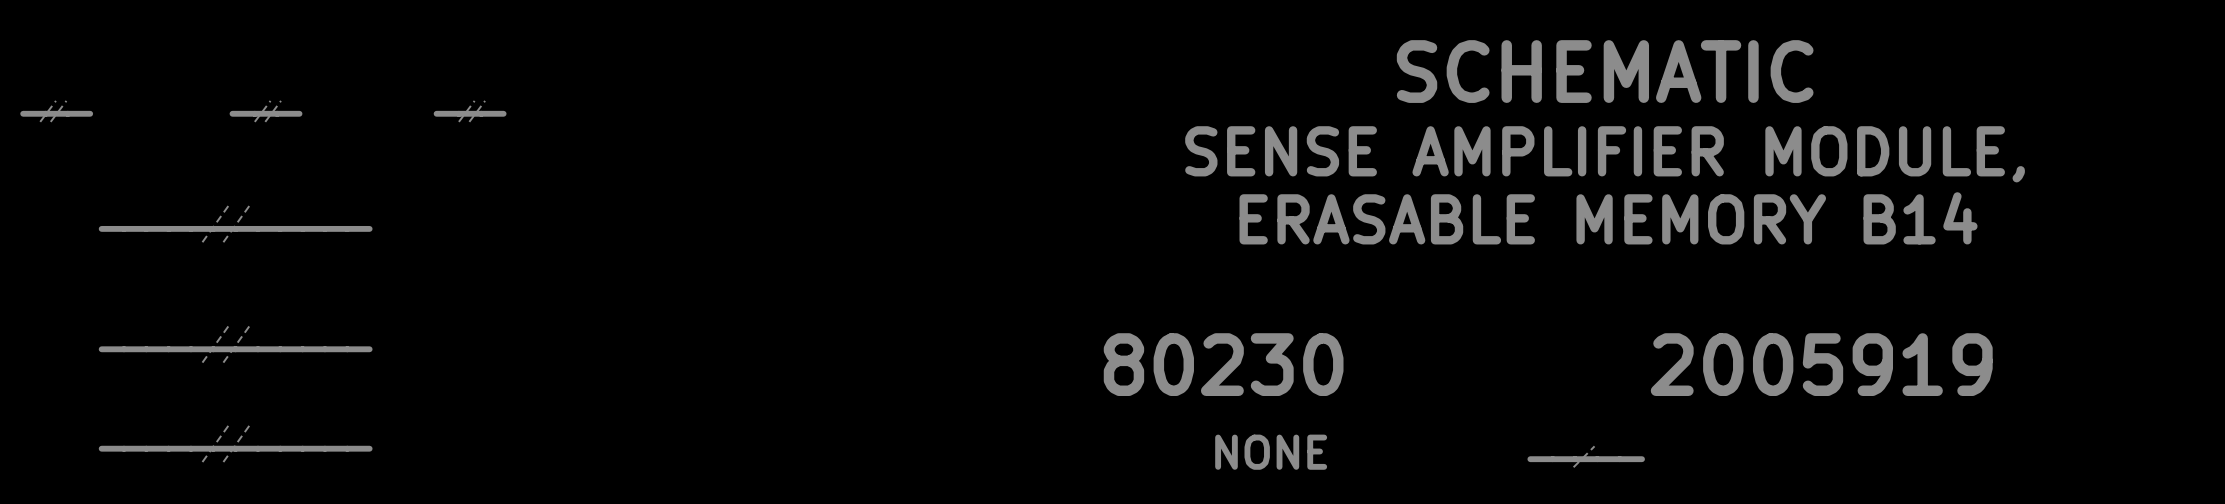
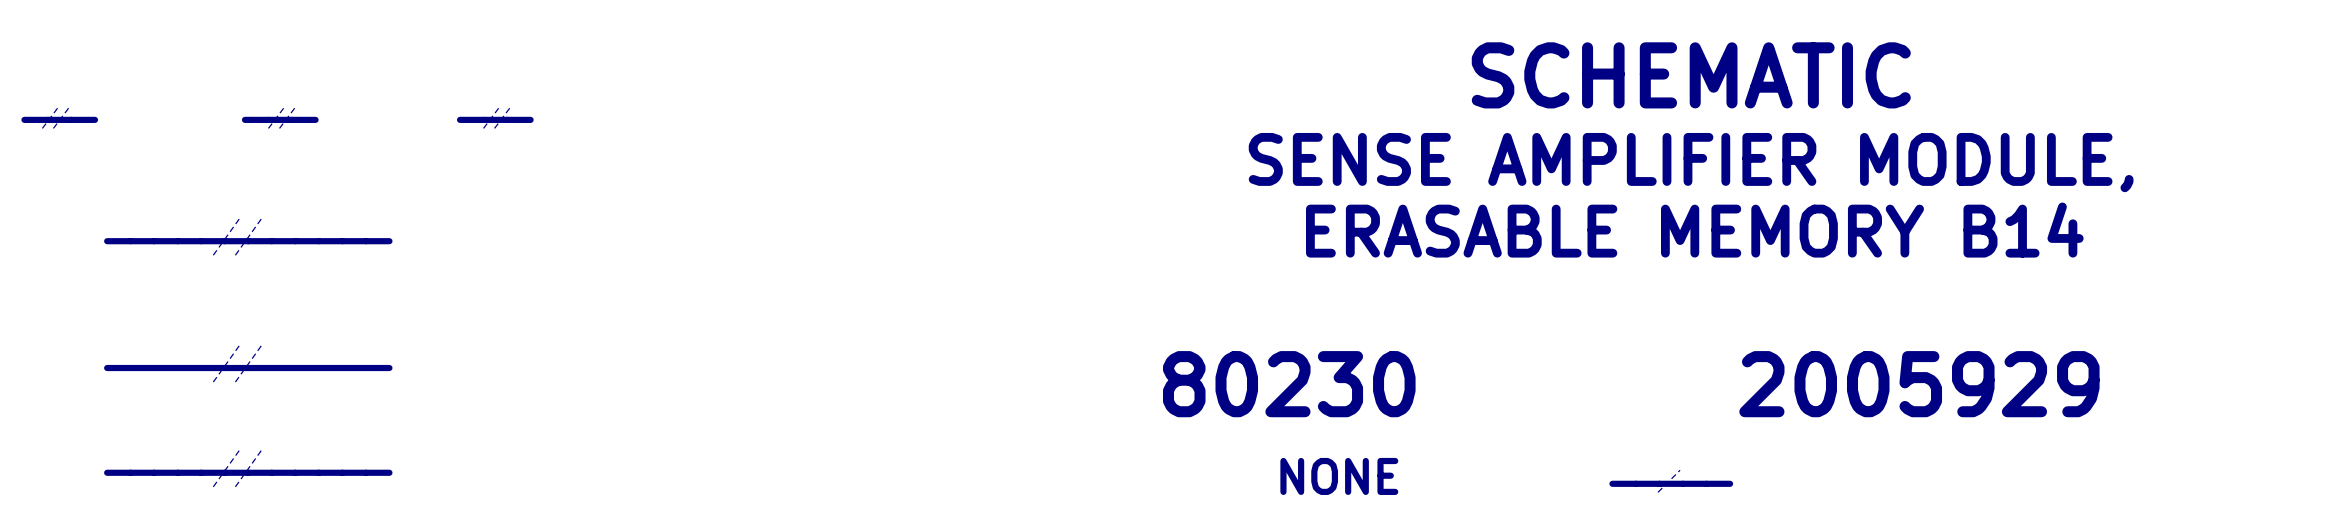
text: 2005919 (1821, 364) -> 2005929 (1919, 384)

